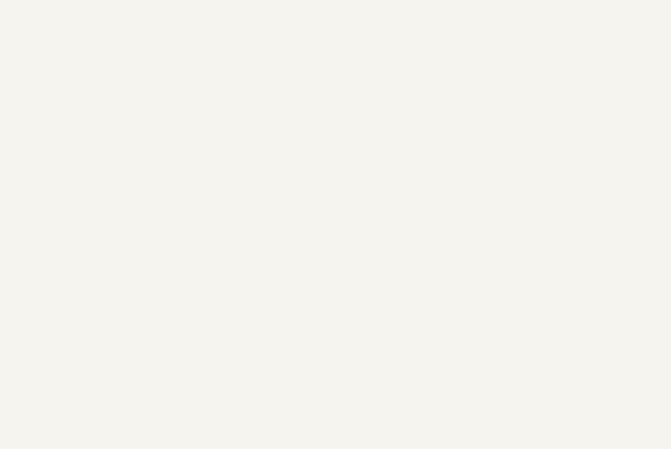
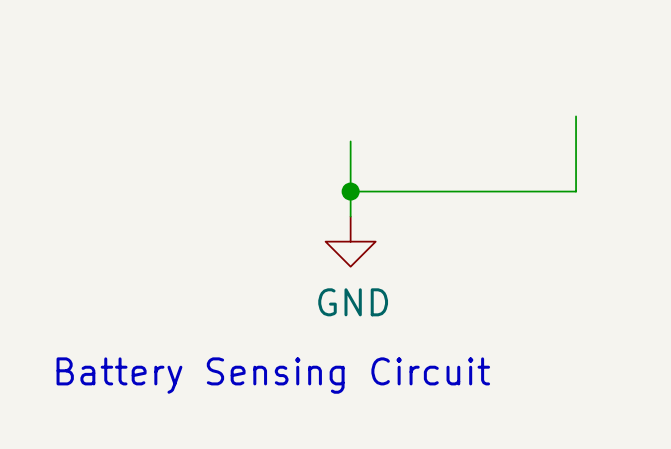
wire: none -> (576, 116) (576, 191) (350, 191)
wire: none -> (350, 141) (350, 216)
junction: none -> (350, 191)
power symbol: none -> GND (350, 241)
text: none -> Battery Sensing Circuit (273, 375)

